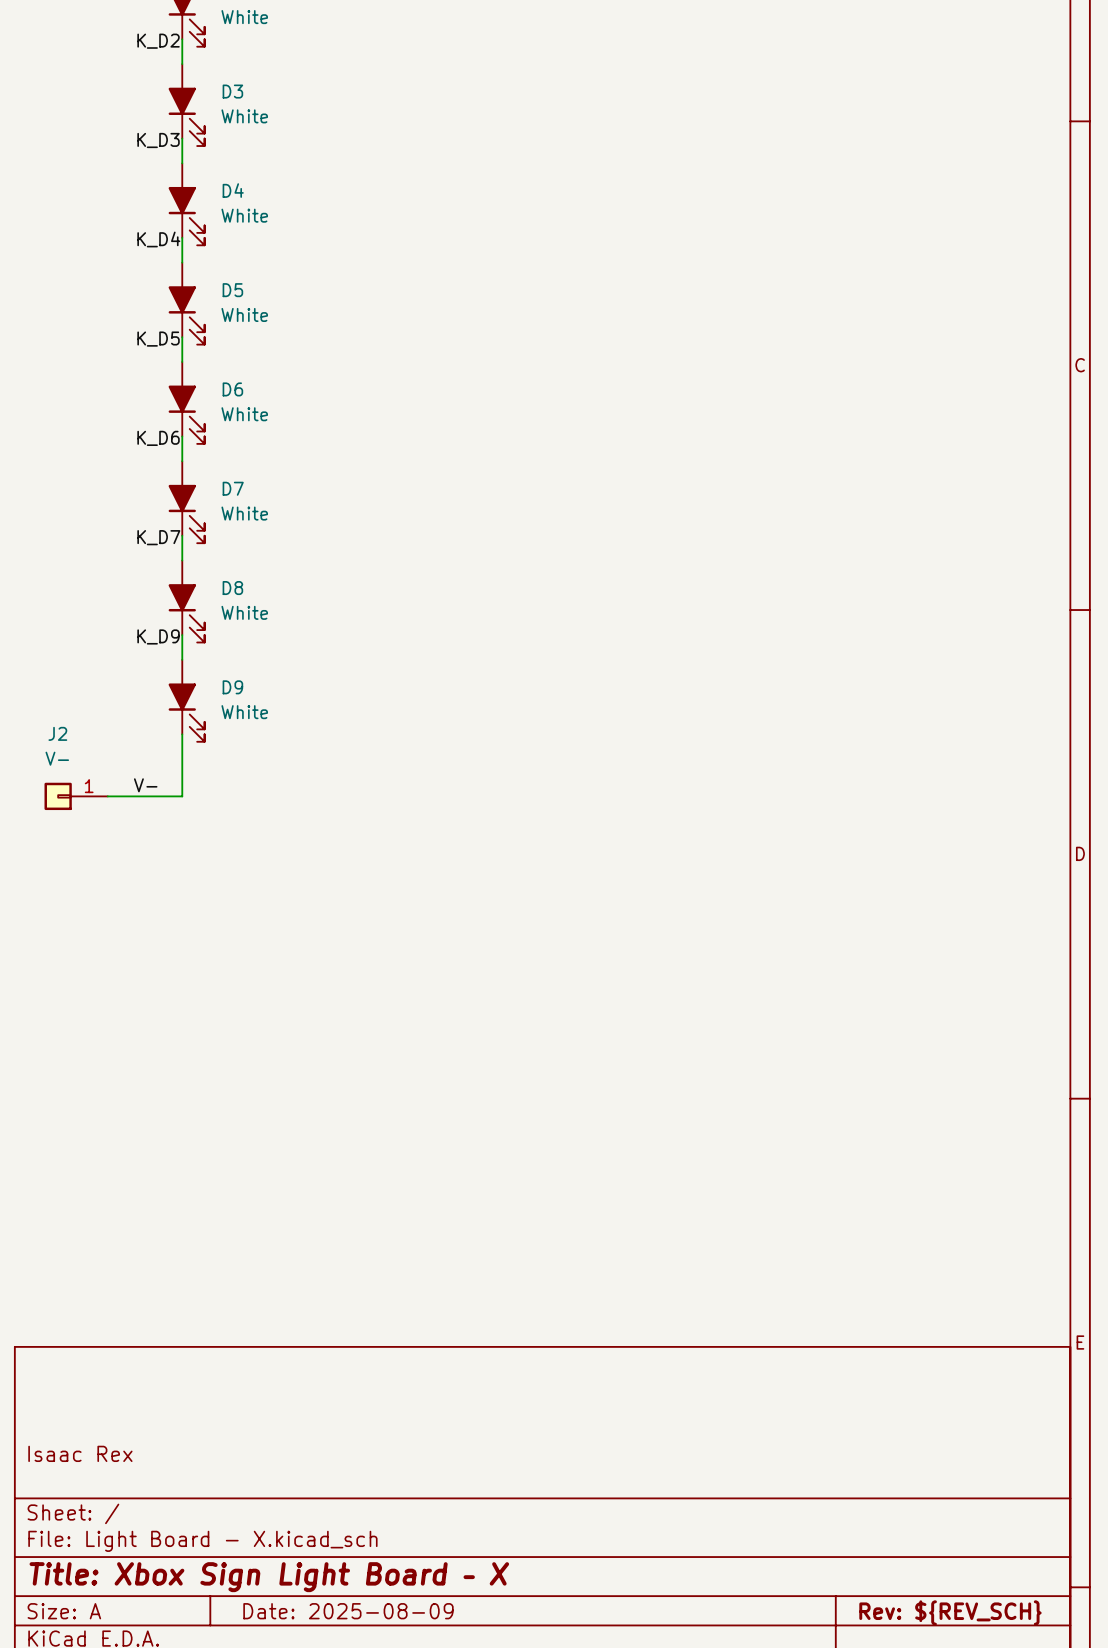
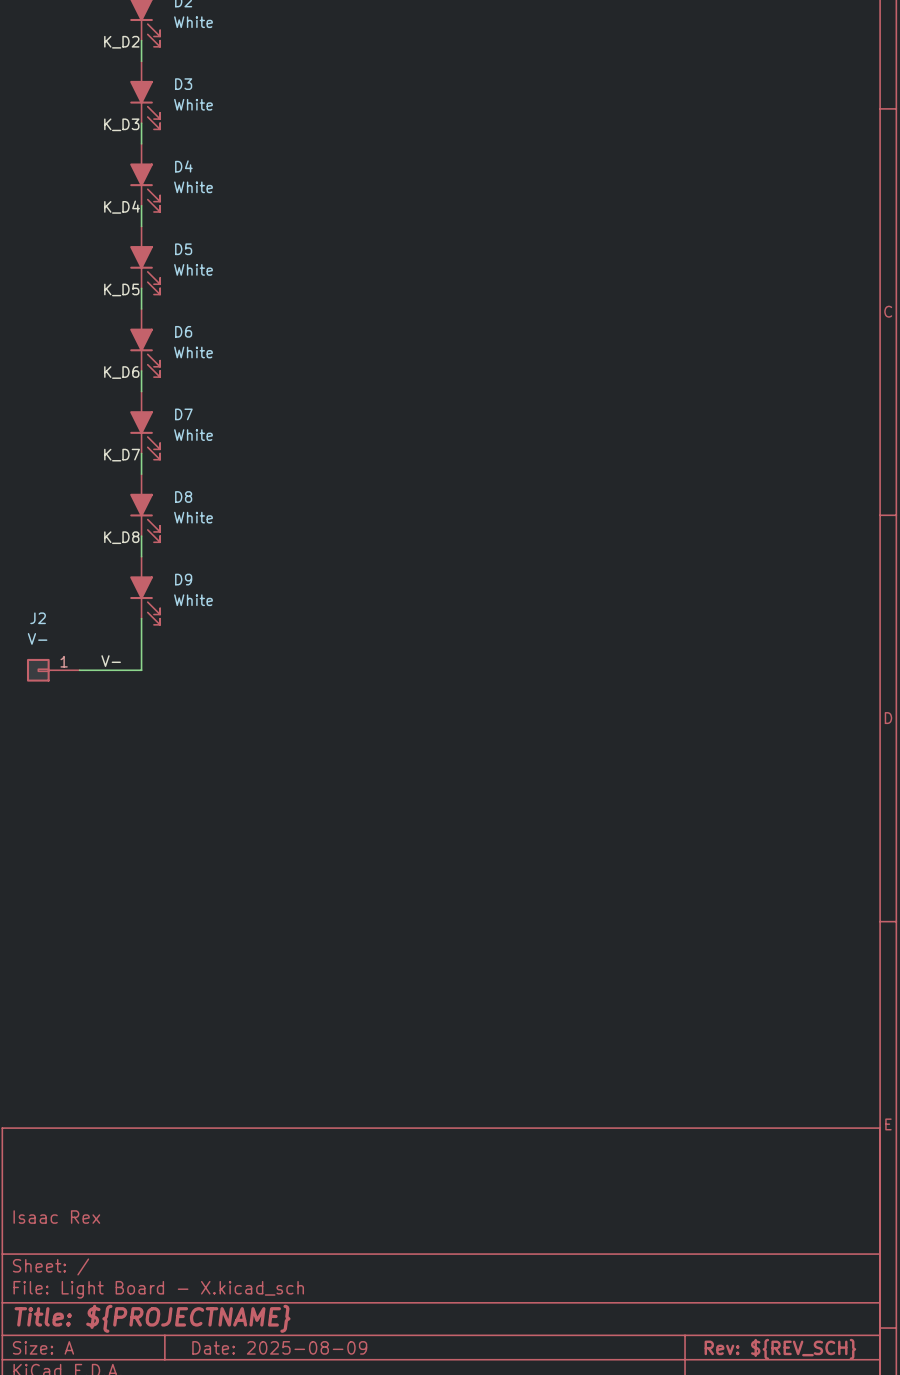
label: K_D9 (158, 636) -> K_D8 (121, 537)
title block: Title: Xbox Sign Light Board – X (269, 1577) -> Title: ${PROJECTNAME} (152, 1318)

